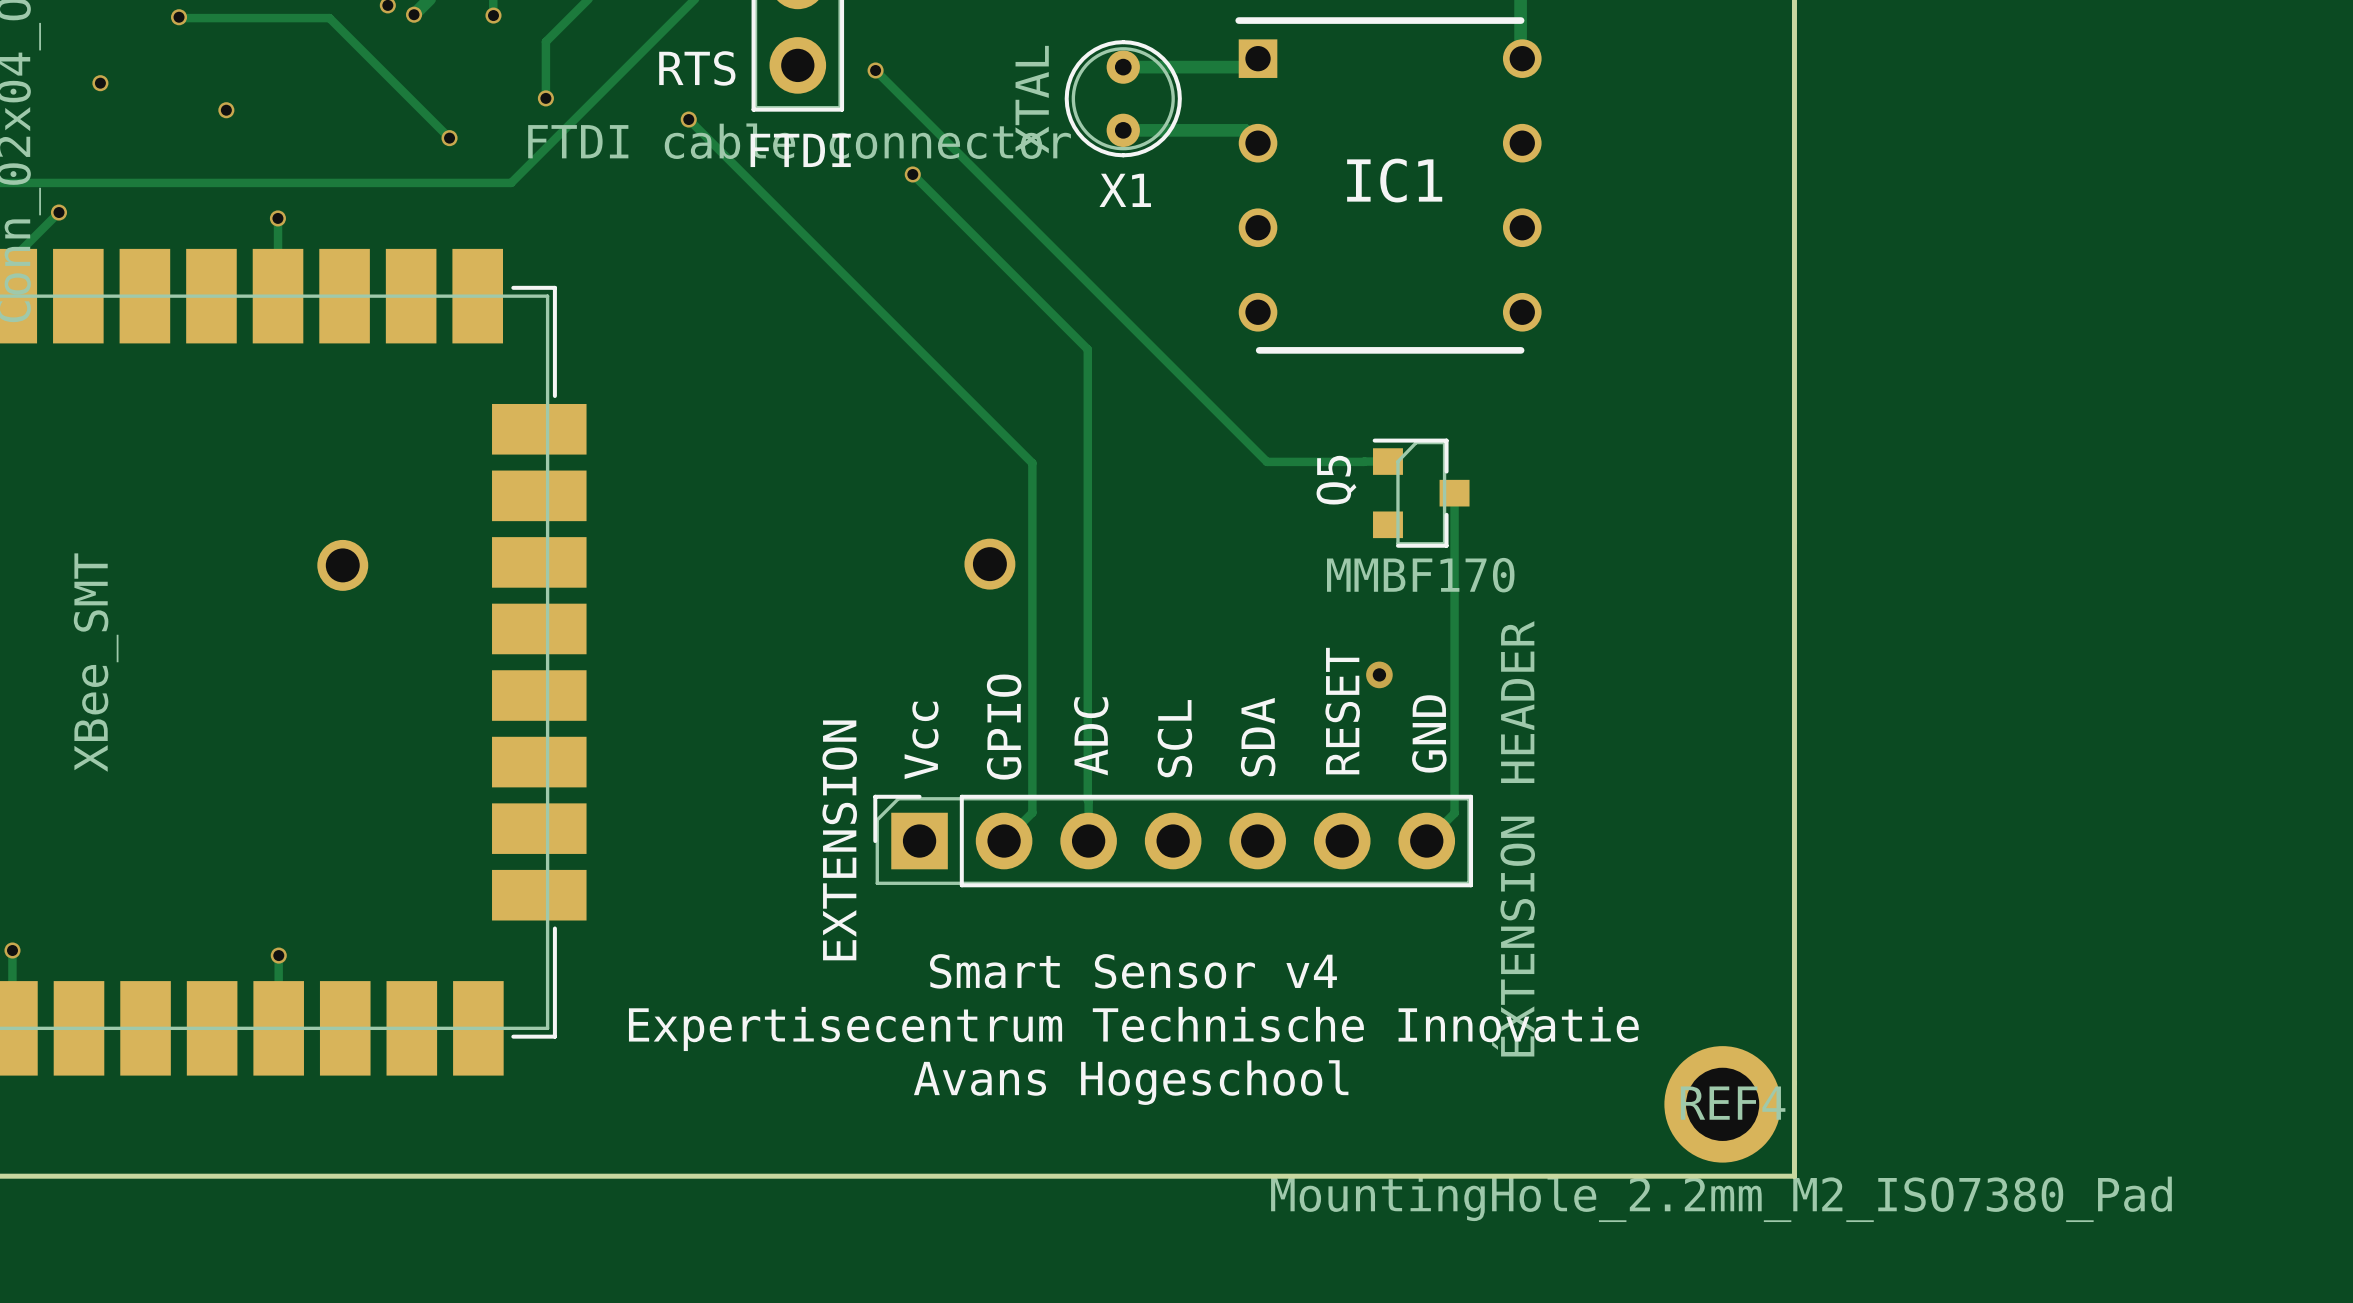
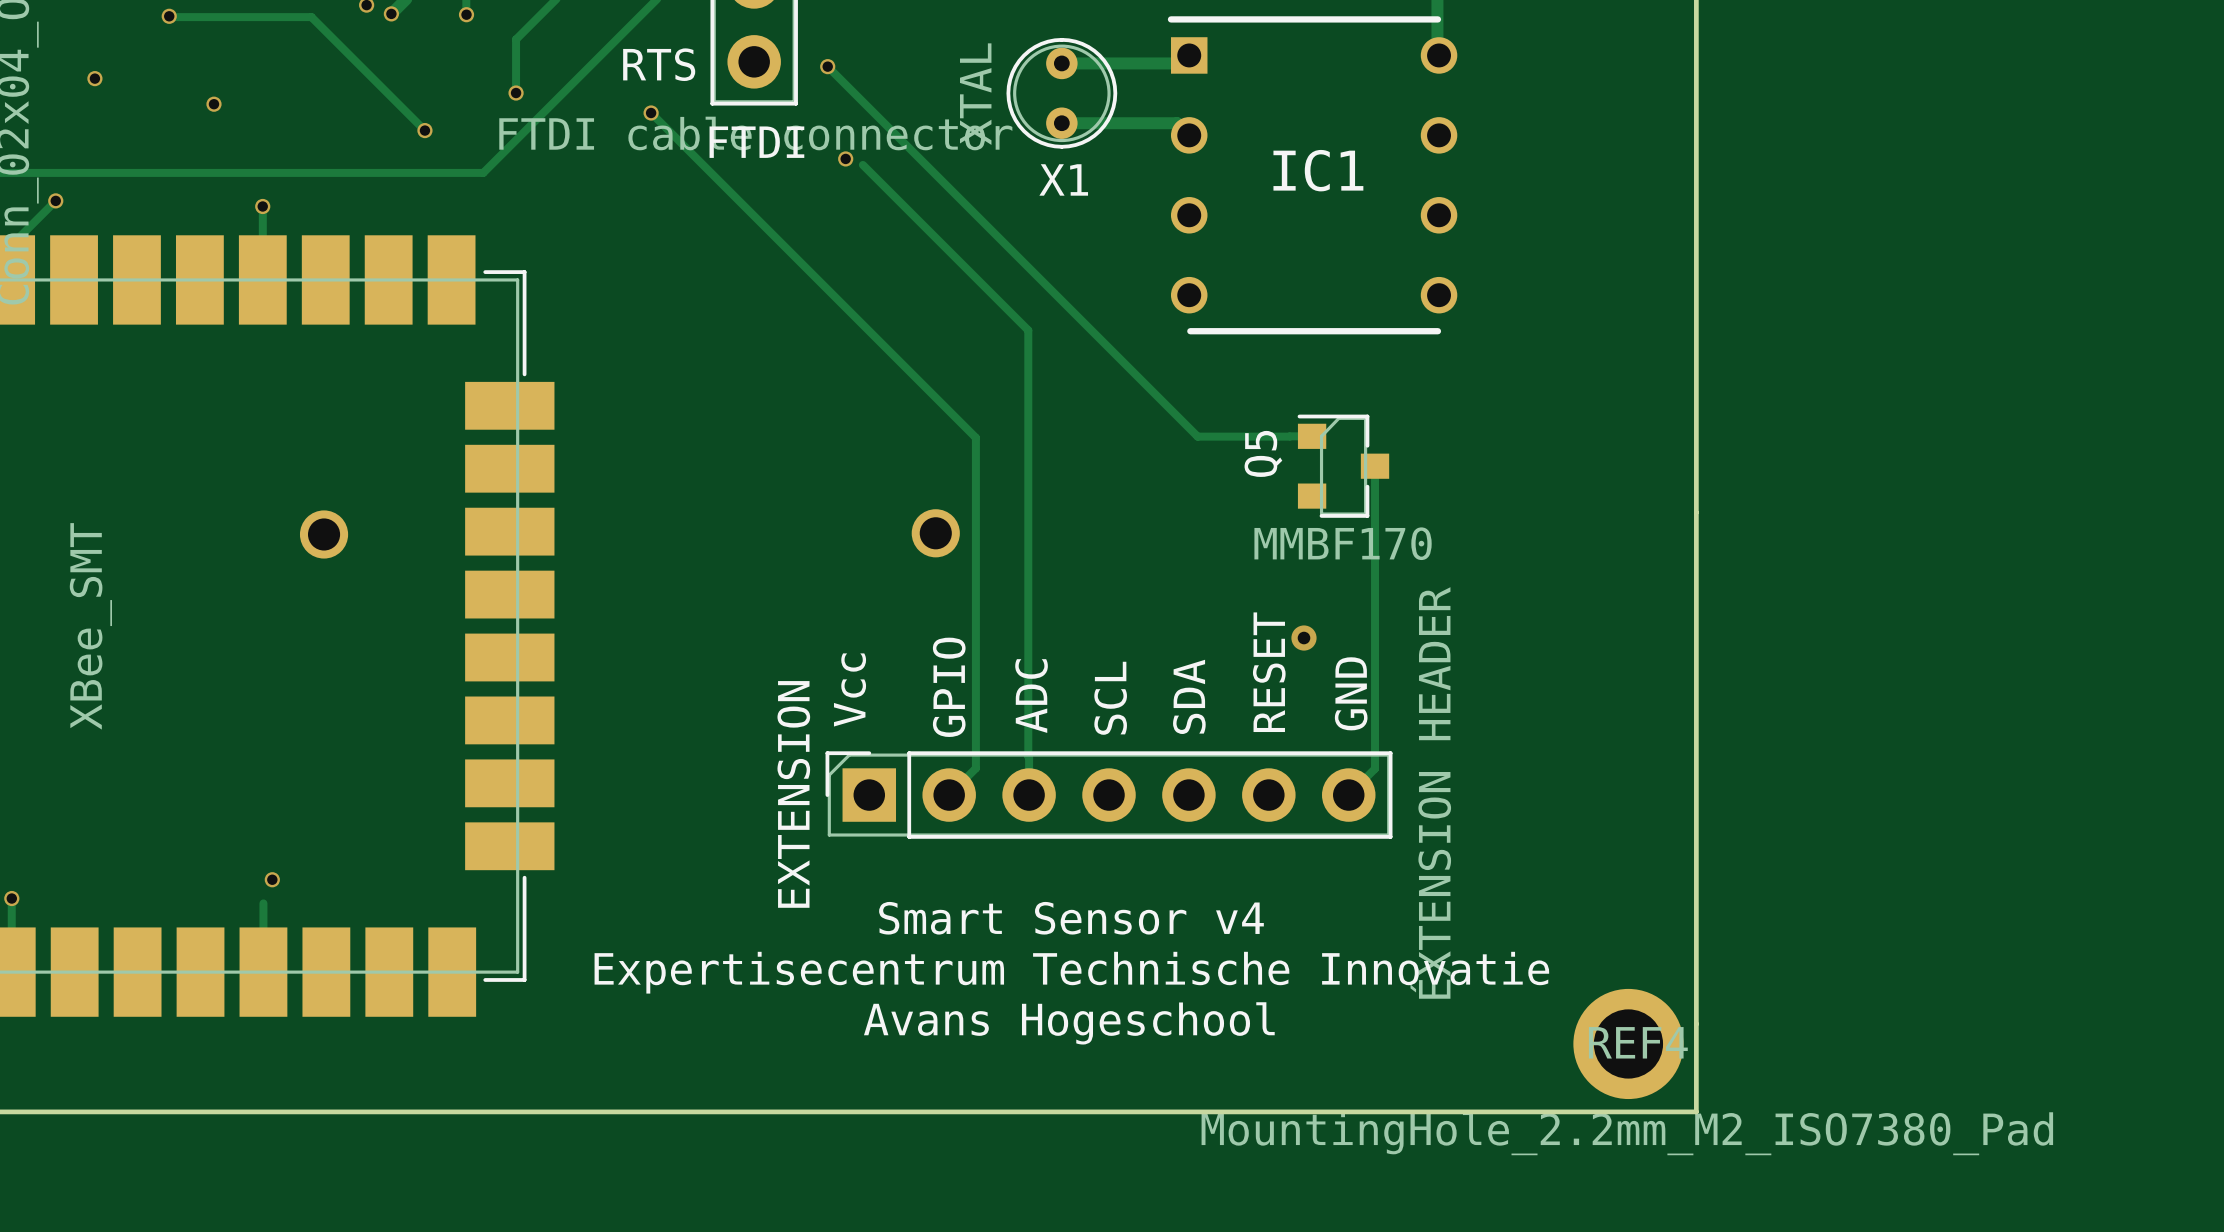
via position: (912, 174) -> (845, 158)
text position: Vcc (921, 740) -> Vcc (850, 689)
via position: (278, 955) -> (272, 879)

